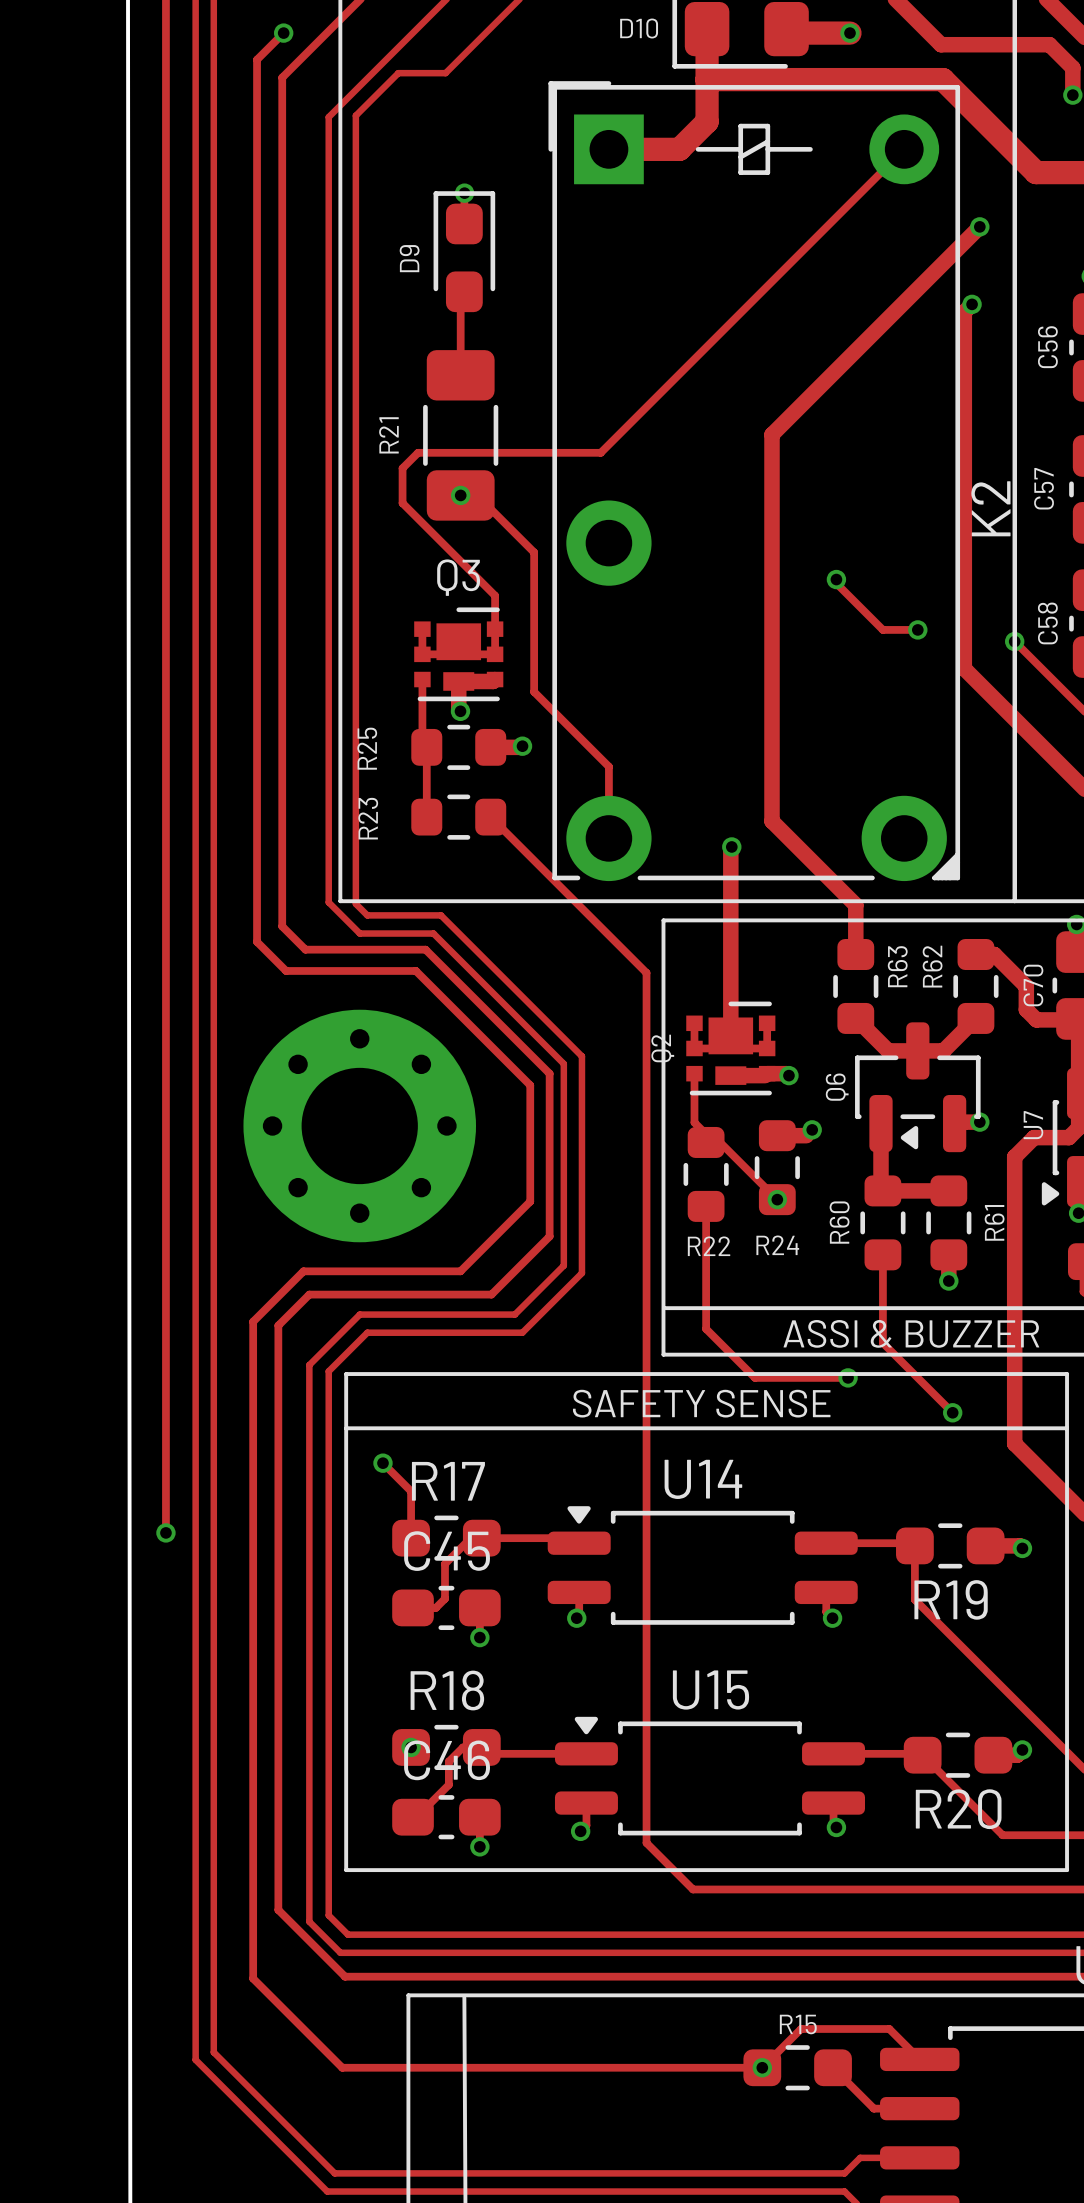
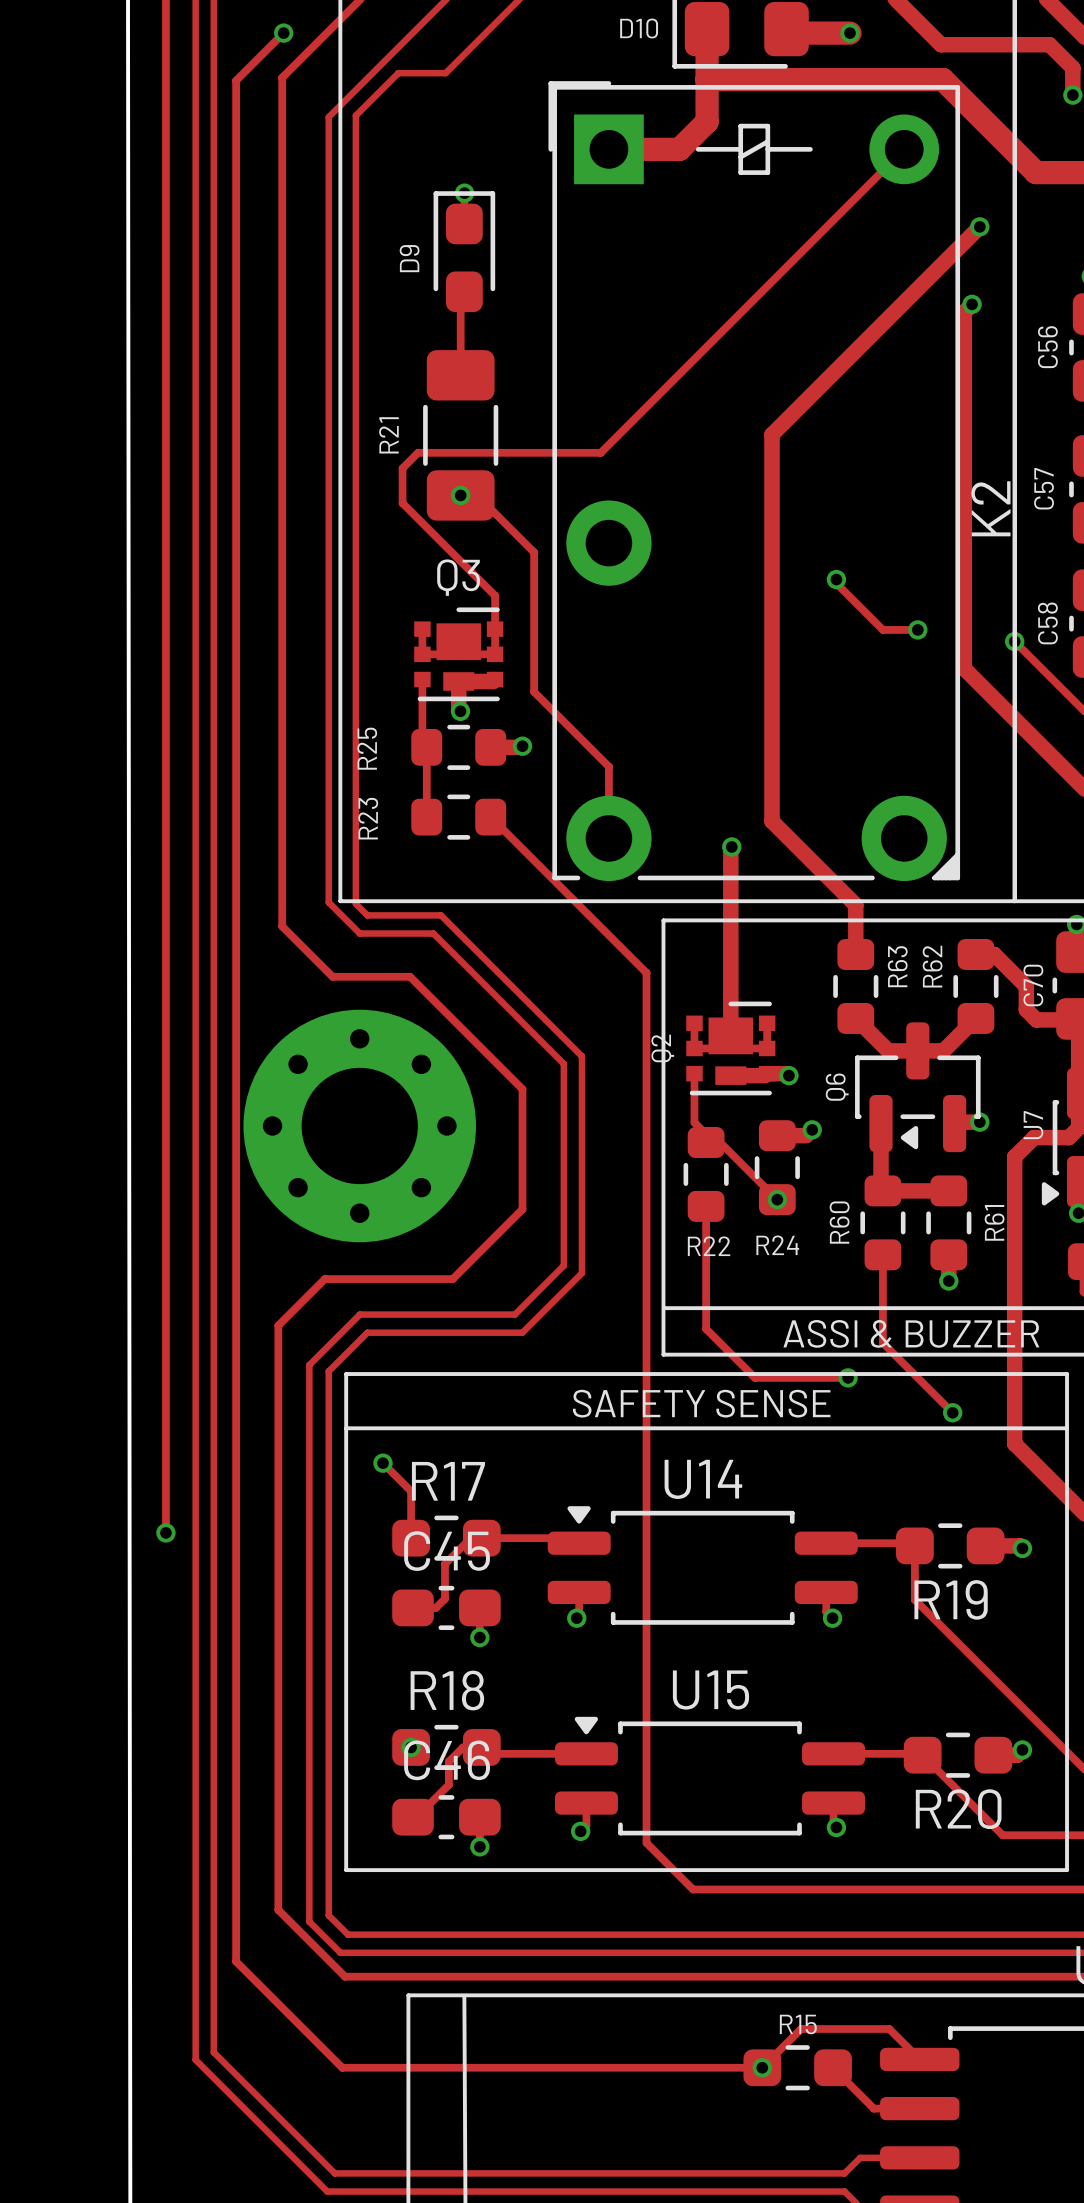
track: (257, 59) (257, 941) (286, 970) (415, 970) (530, 1085) (530, 1201) (522, 1209) -> (257, 59) (236, 80) (236, 1961) (253, 1978)
track: (305, 949) (425, 949) (549, 1073) (549, 1236) (491, 1294) (309, 1294) -> (305, 949) (332, 976) (410, 976) (522, 1089) (522, 1209)
track: (460, 1271) (303, 1271) (253, 1321) (253, 1978) -> (460, 1271) (452, 1279) (324, 1279) (309, 1294)

